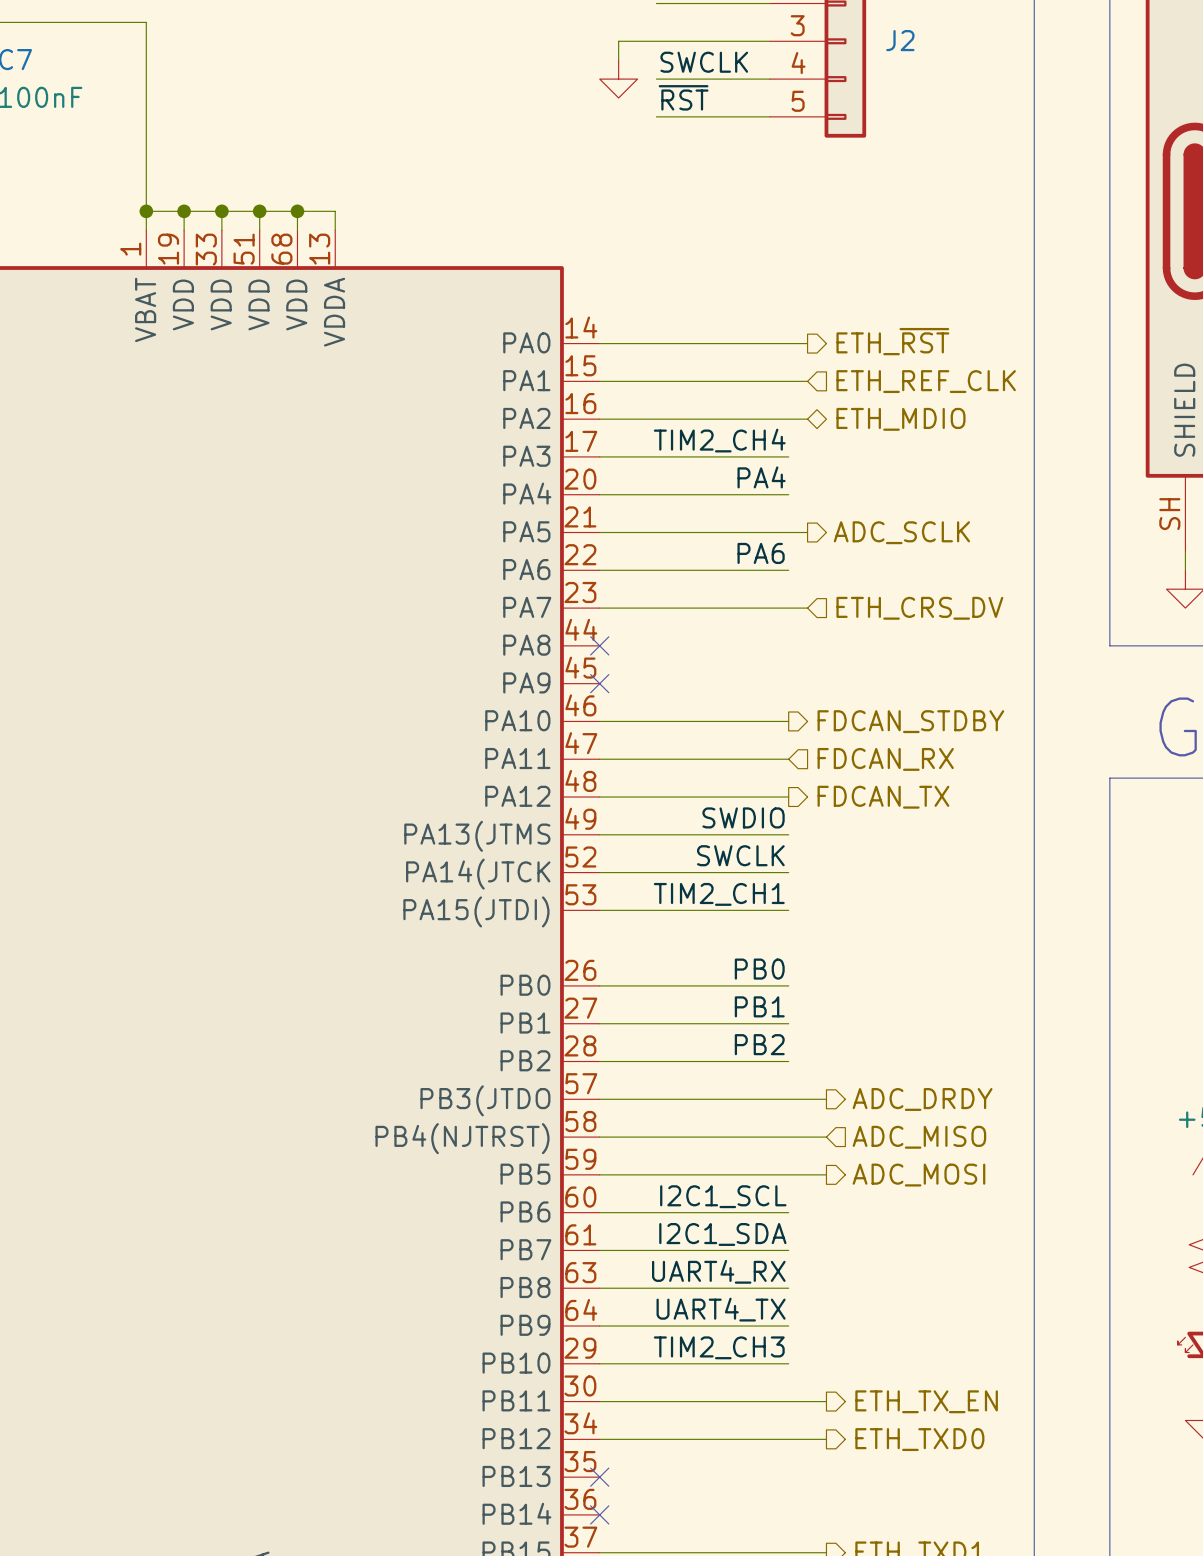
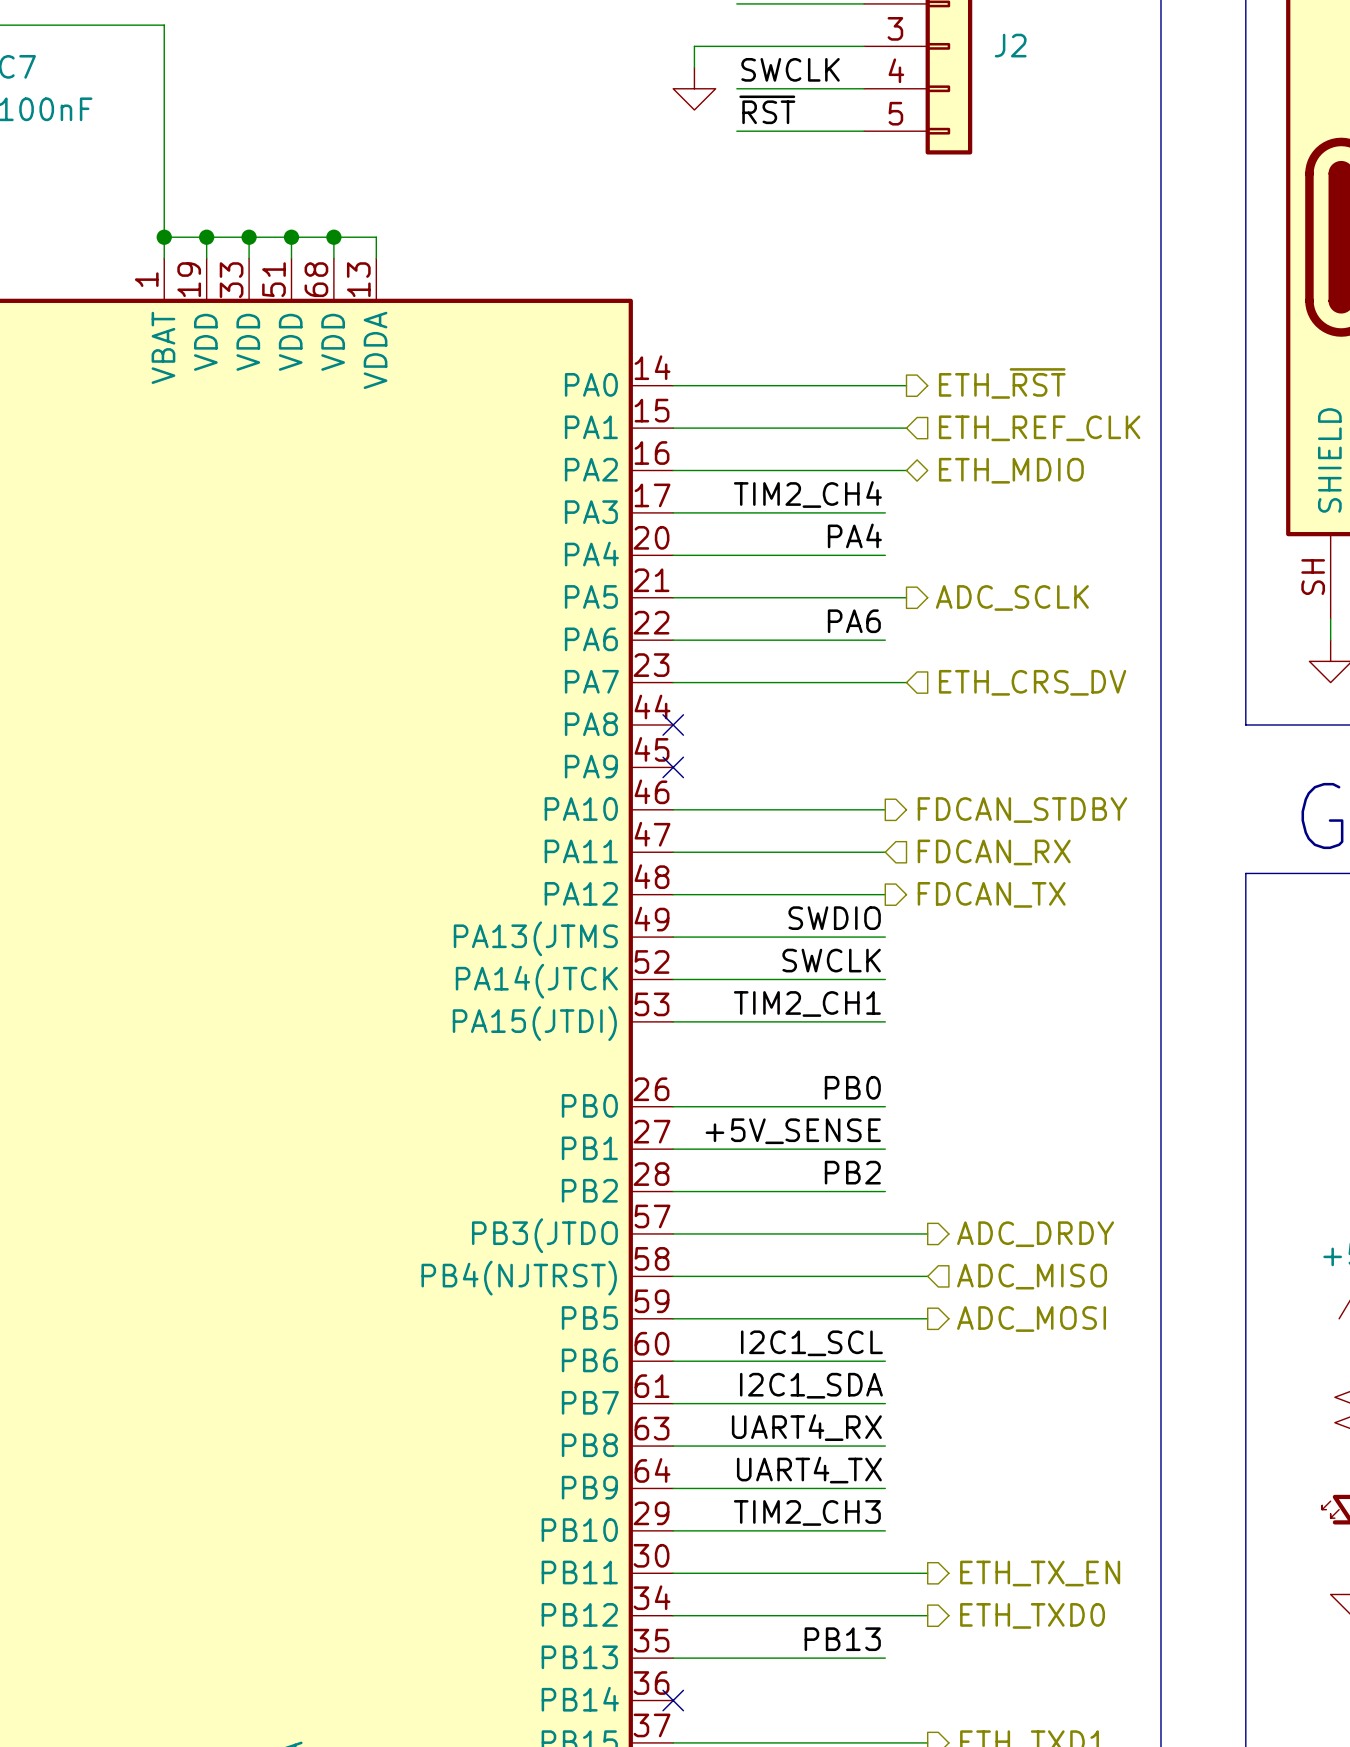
label: PB1 (759, 1006) -> +5V_SENSE (793, 1131)
label: none -> PB13 (842, 1639)
wire: none -> (673, 1658) (885, 1658)
no-connect mark: (599, 1477) -> none

